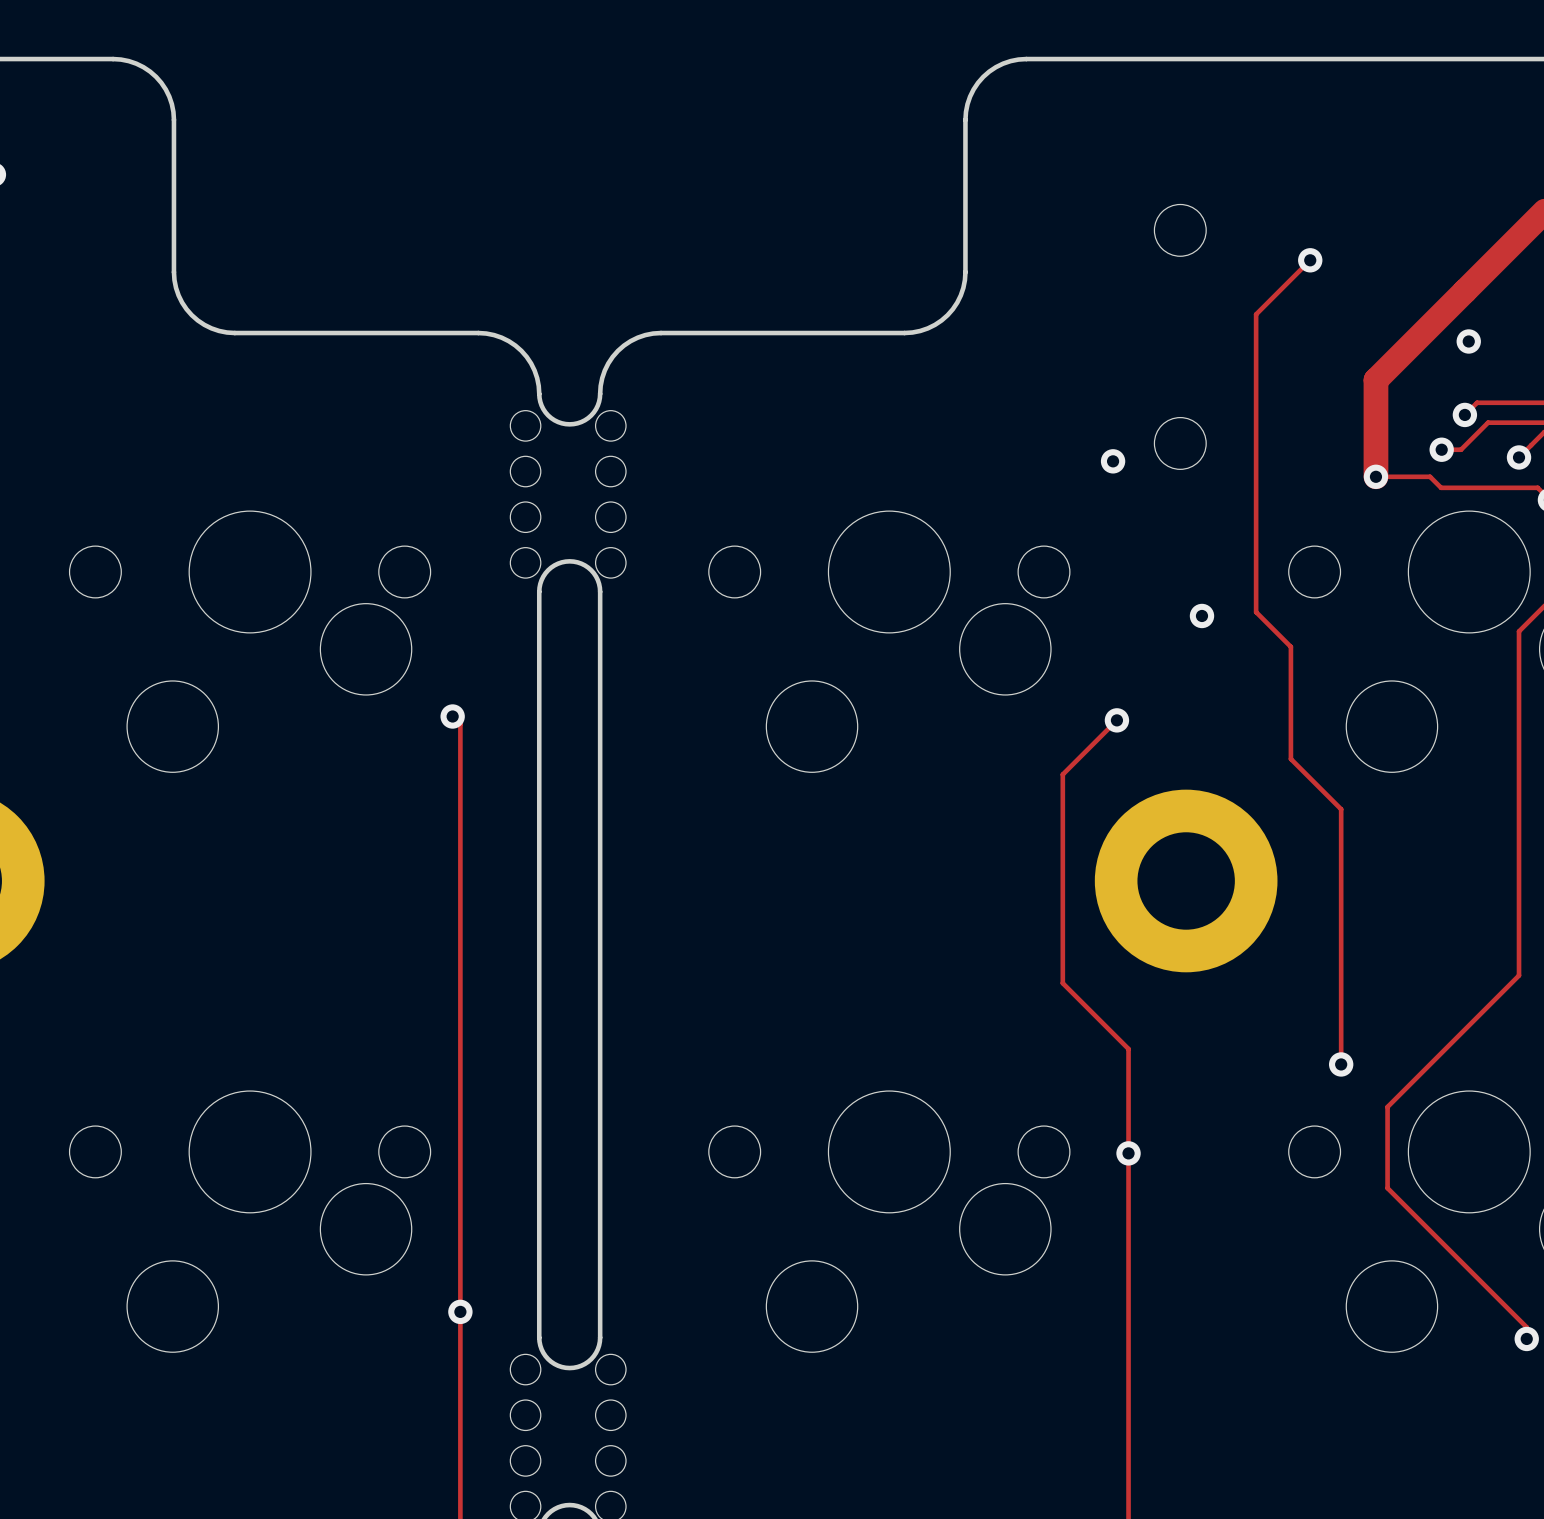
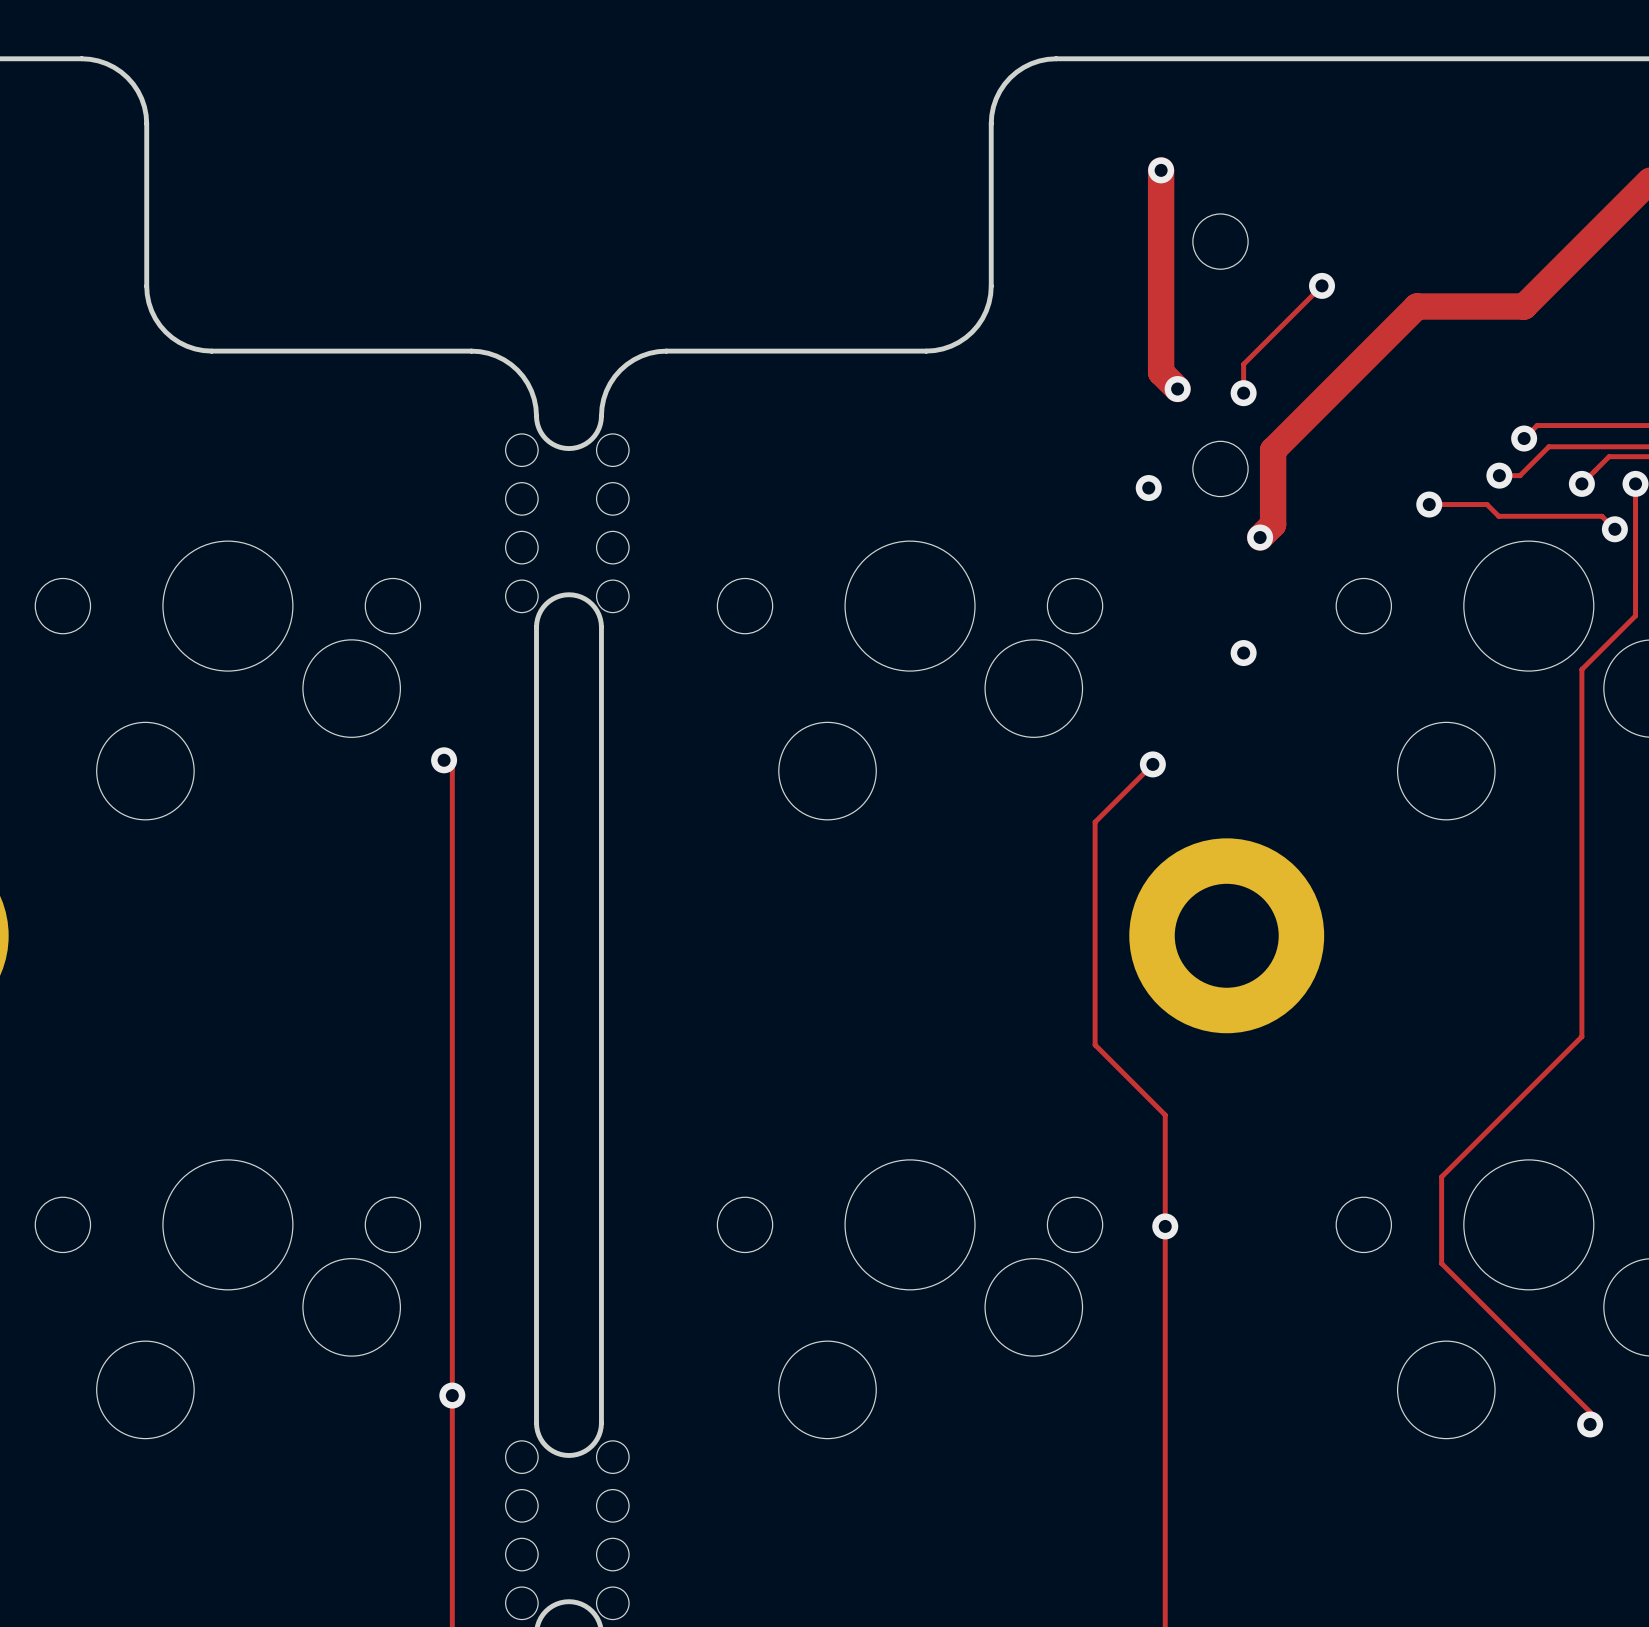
track: none -> (1161, 170) (1161, 372) (1177, 389)
via: none -> (1161, 170)
track: (1310, 260) (1256, 314) (1256, 612) (1290, 646) (1290, 759) (1341, 809) (1341, 1064) -> none
via position: (1310, 260) -> (1322, 285)
track: none -> (1322, 285) (1243, 364) (1243, 393)
track: (1464, 291) (1375, 380) (1375, 476) -> (1524, 306) (1416, 306) (1273, 450) (1273, 524) (1260, 537)
via: (1468, 341) -> none
via: none -> (1177, 389)
via: none -> (1243, 393)
via: none -> (1260, 537)
via: (1341, 1064) -> none

